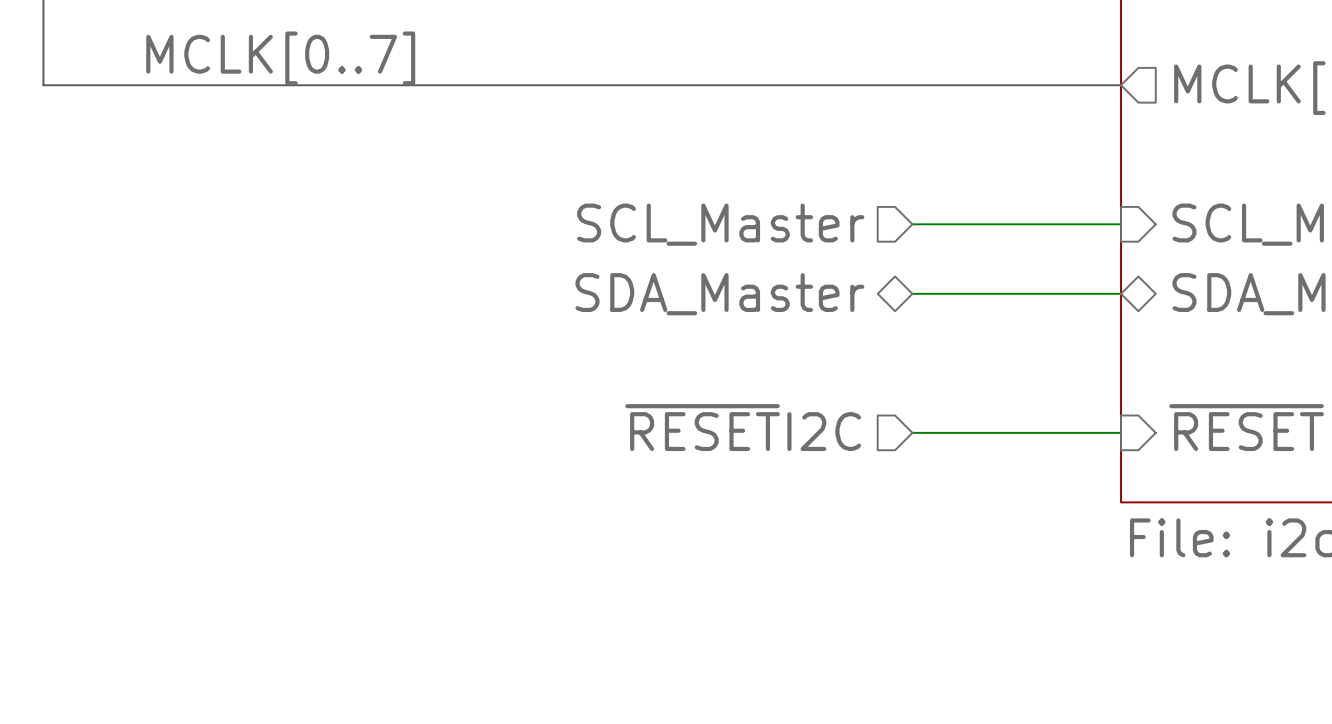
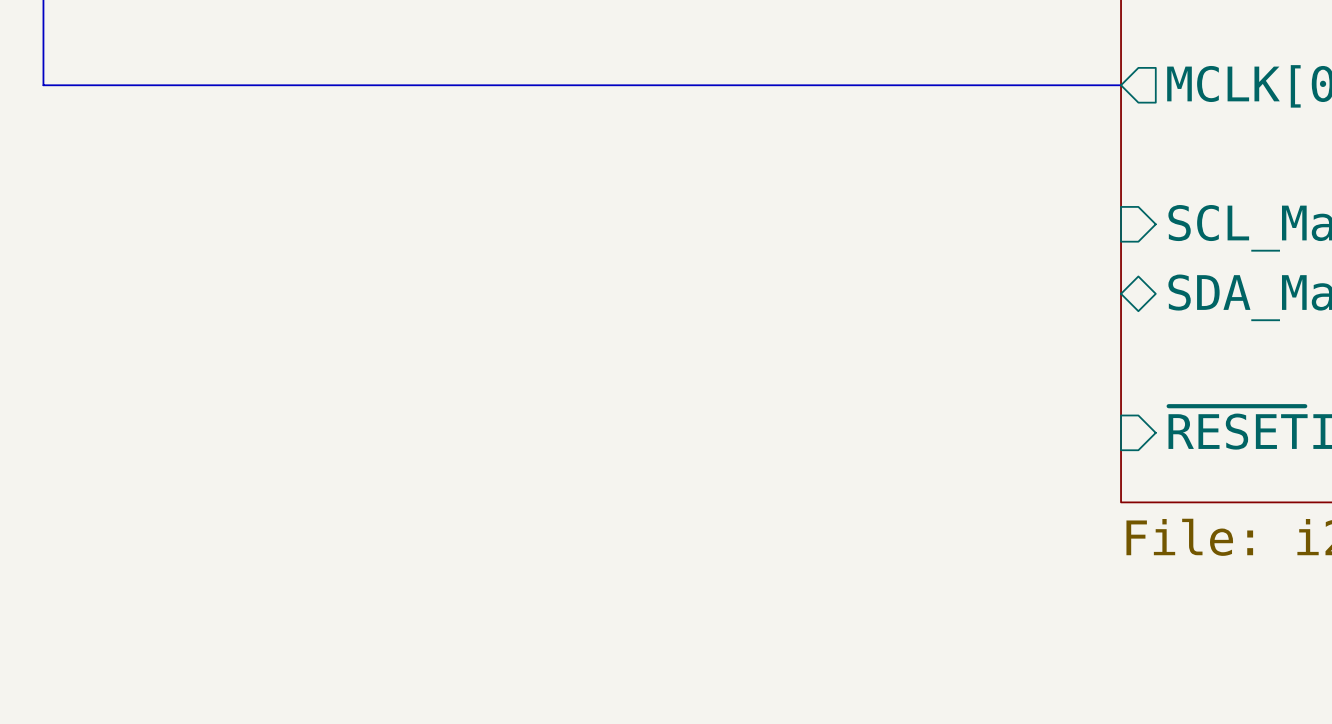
label: MCLK[0..7] (280, 58) -> none
hierarchical label: SCL_Master (720, 224) -> none
wire: (912, 224) (1121, 224) -> none
wire: (912, 293) (1121, 293) -> none
hierarchical label: SDA_Master (719, 294) -> none
hierarchical label: ~{RESET}I2C (743, 427) -> none
wire: (912, 432) (1121, 432) -> none

